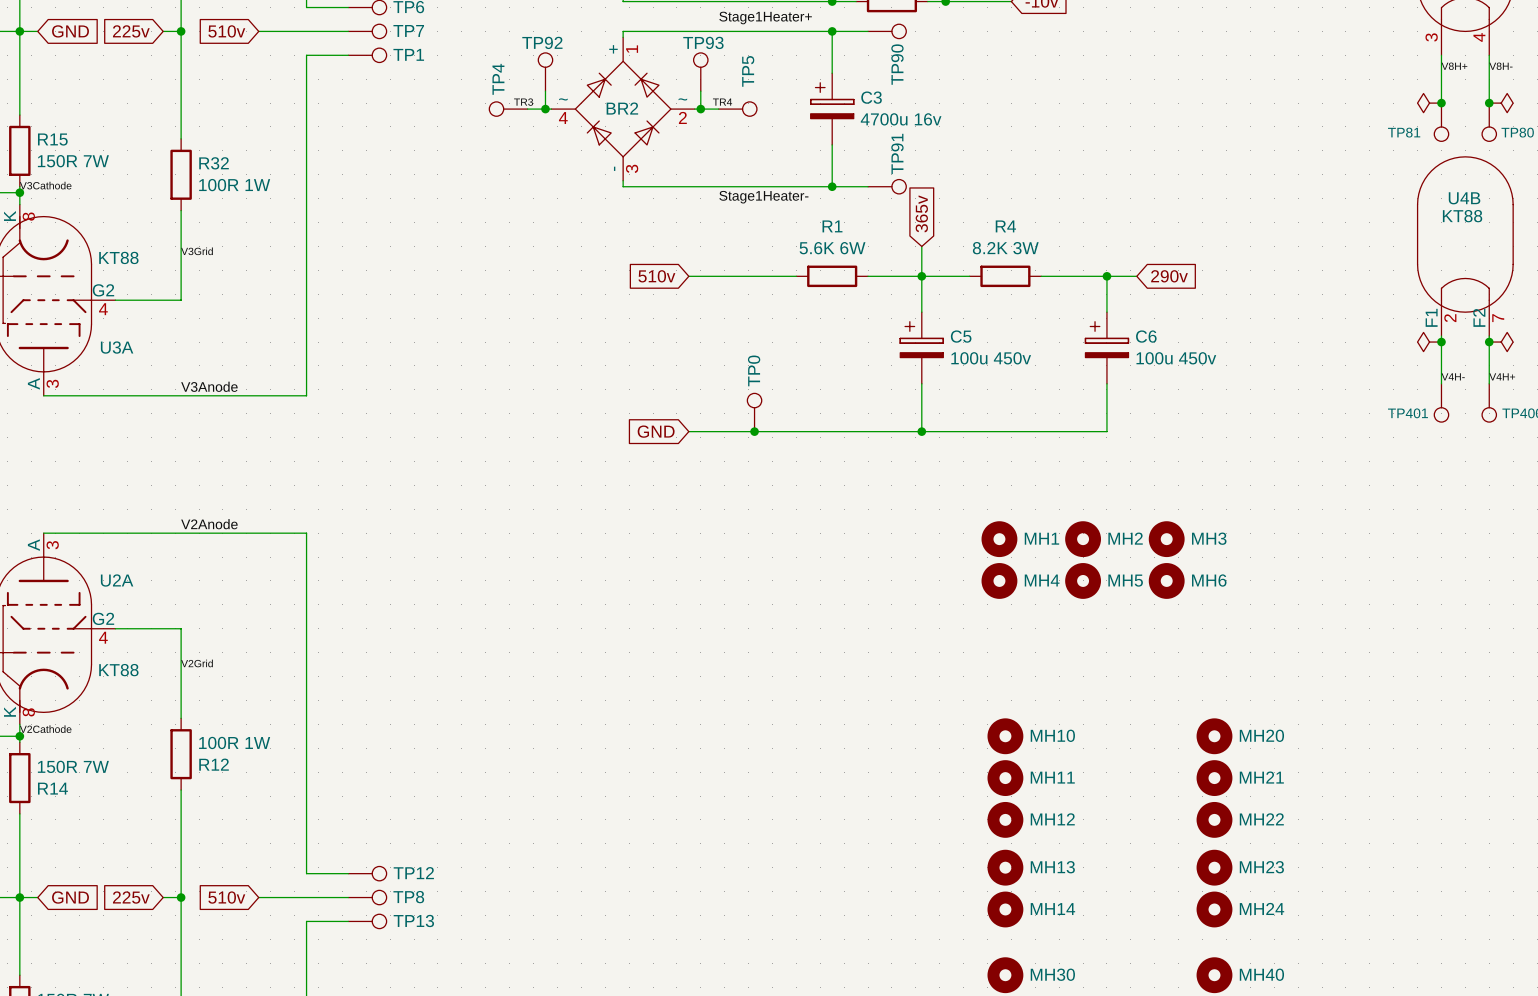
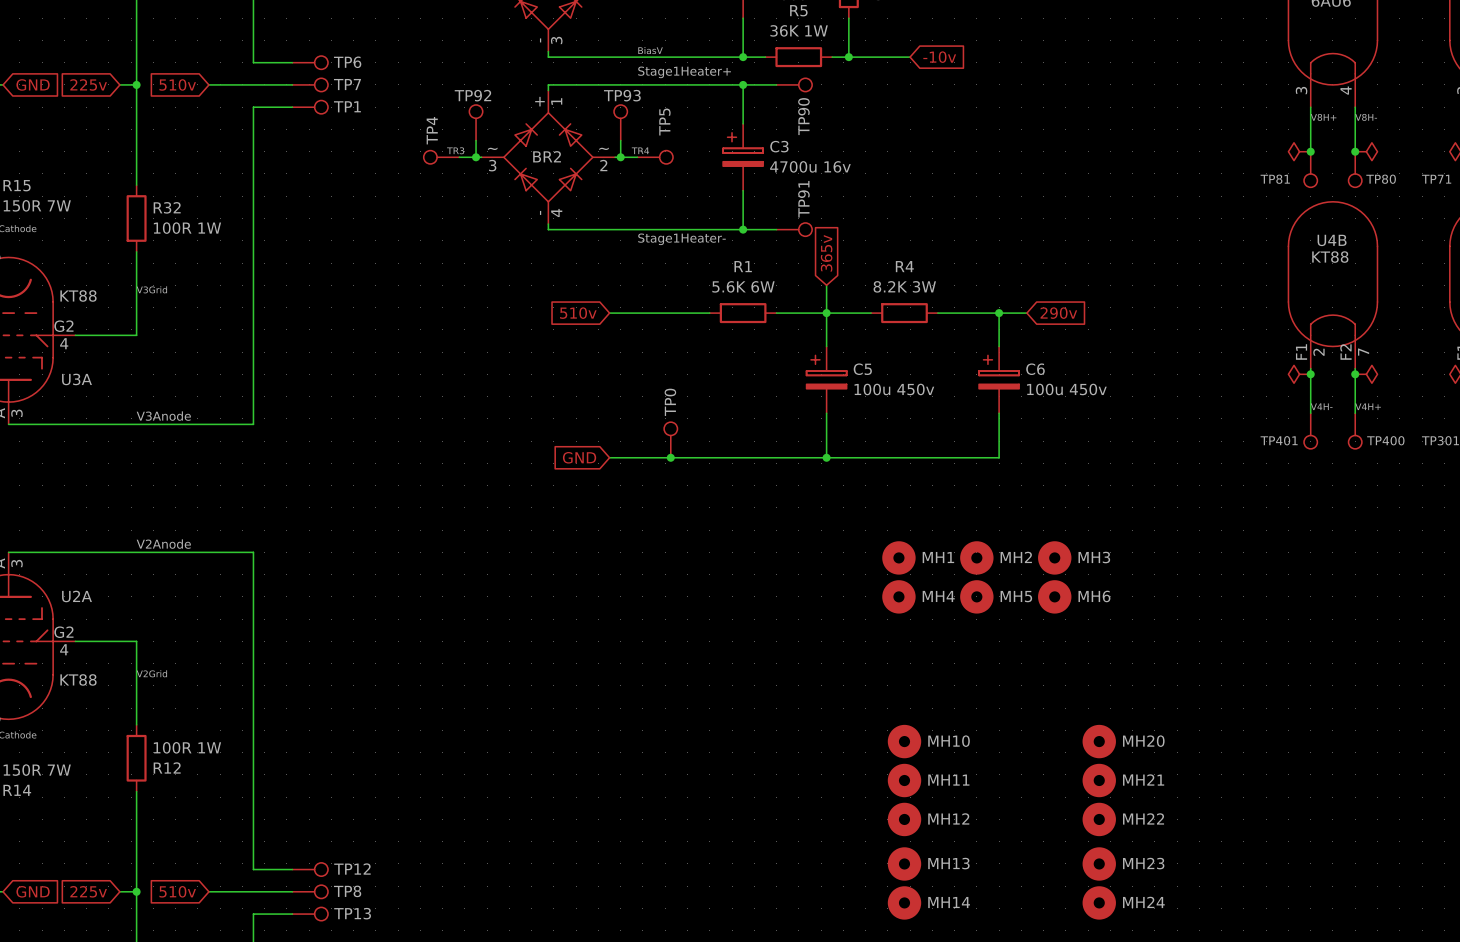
BR2 pin number: 4 (563, 118) -> 3 (492, 165)
BR2 pin number: 3 (632, 168) -> 4 (556, 212)

